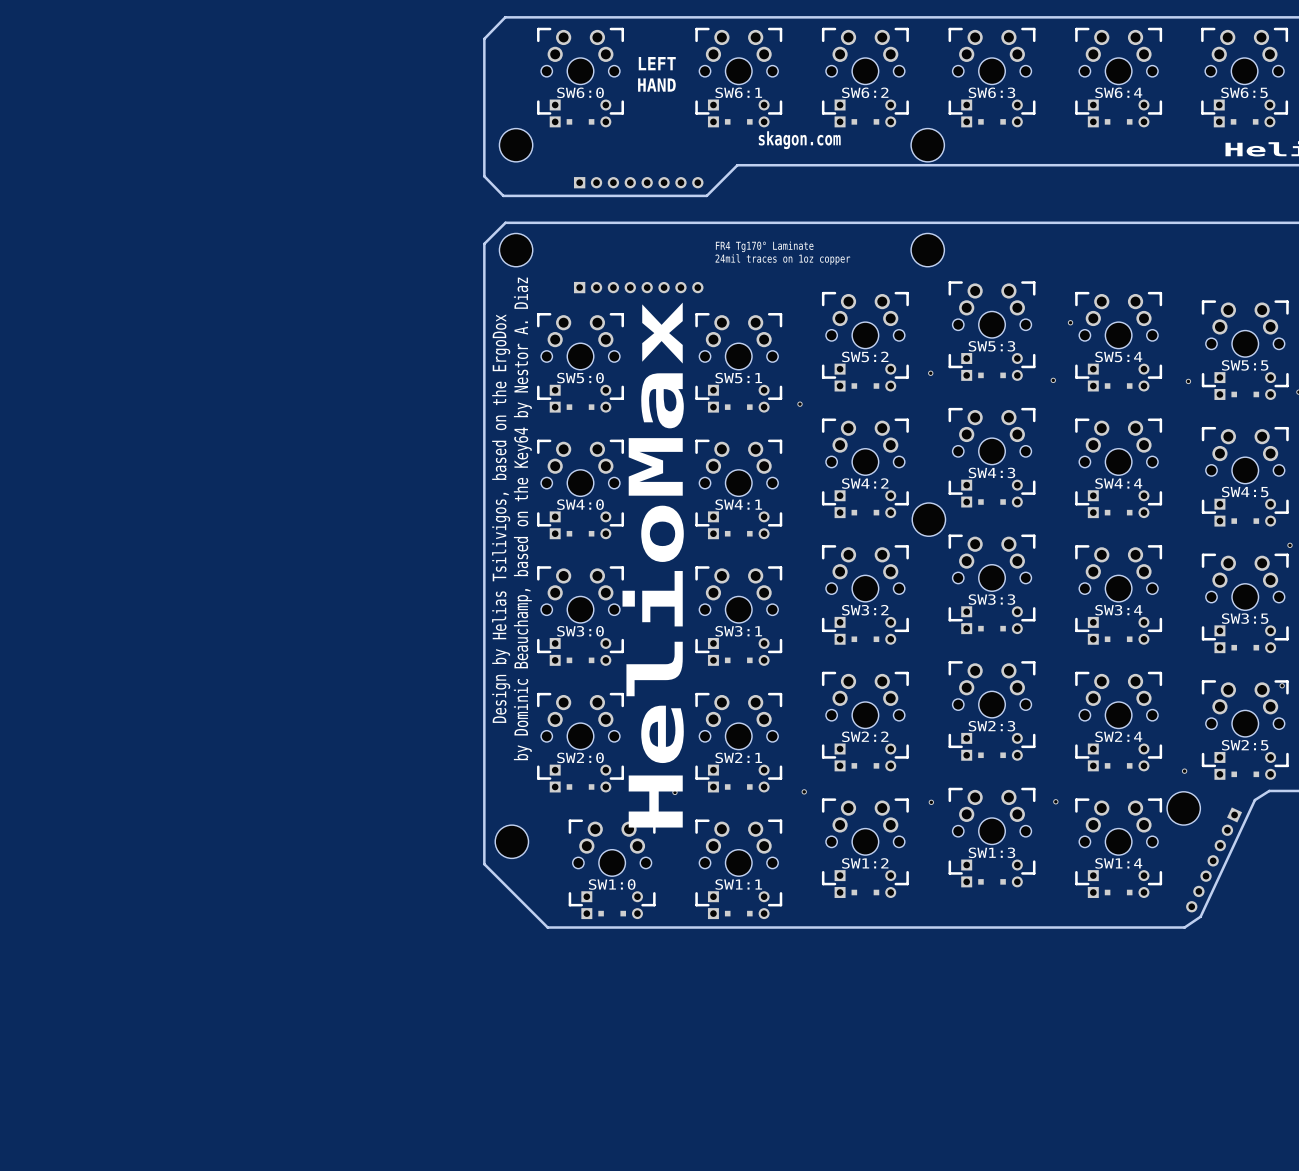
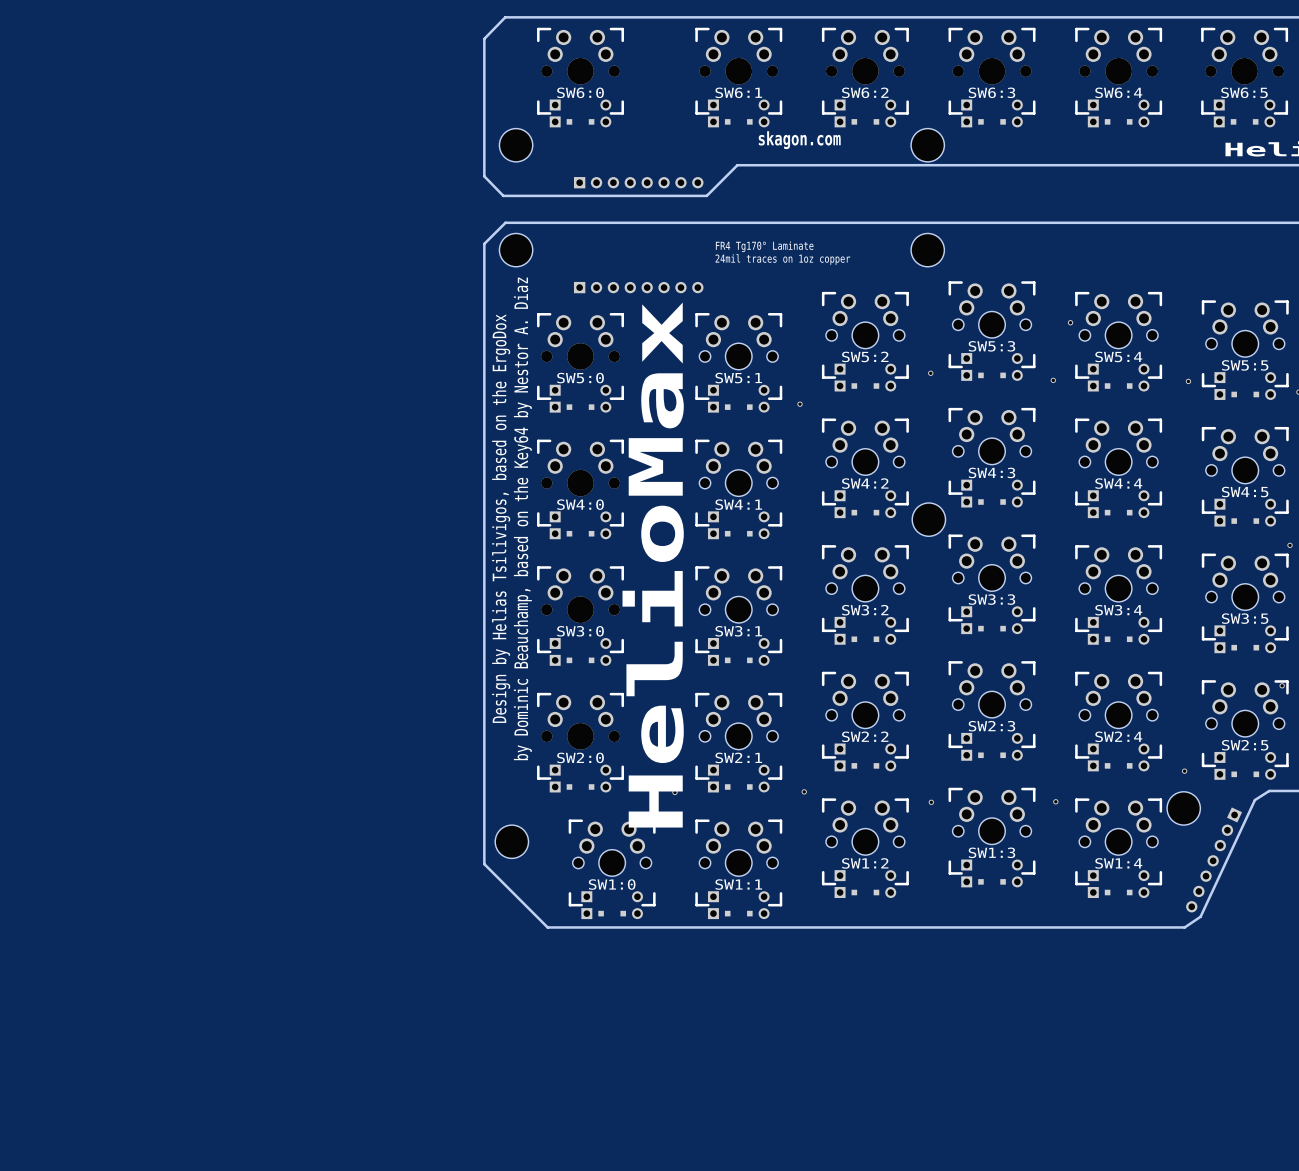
part footprint: [537, 27, 624, 128] -> [537, 27, 624, 128]
part footprint: [695, 27, 783, 128] -> [695, 27, 783, 128]
part footprint: [821, 27, 909, 128] -> [821, 27, 909, 128]
part footprint: [948, 27, 1036, 128] -> [948, 27, 1036, 128]
part footprint: [1075, 27, 1163, 128] -> [1075, 27, 1163, 128]
part footprint: [1201, 27, 1289, 128] -> [1201, 27, 1289, 128]
text: LEFT (657, 63) -> none
text: HAND (656, 85) -> none
part footprint: [537, 313, 624, 413] -> [537, 313, 624, 413]
part footprint: [537, 439, 624, 540] -> [537, 439, 624, 540]
part footprint: [537, 566, 624, 666] -> [537, 566, 624, 666]
part footprint: [537, 692, 624, 793] -> [537, 692, 624, 793]

